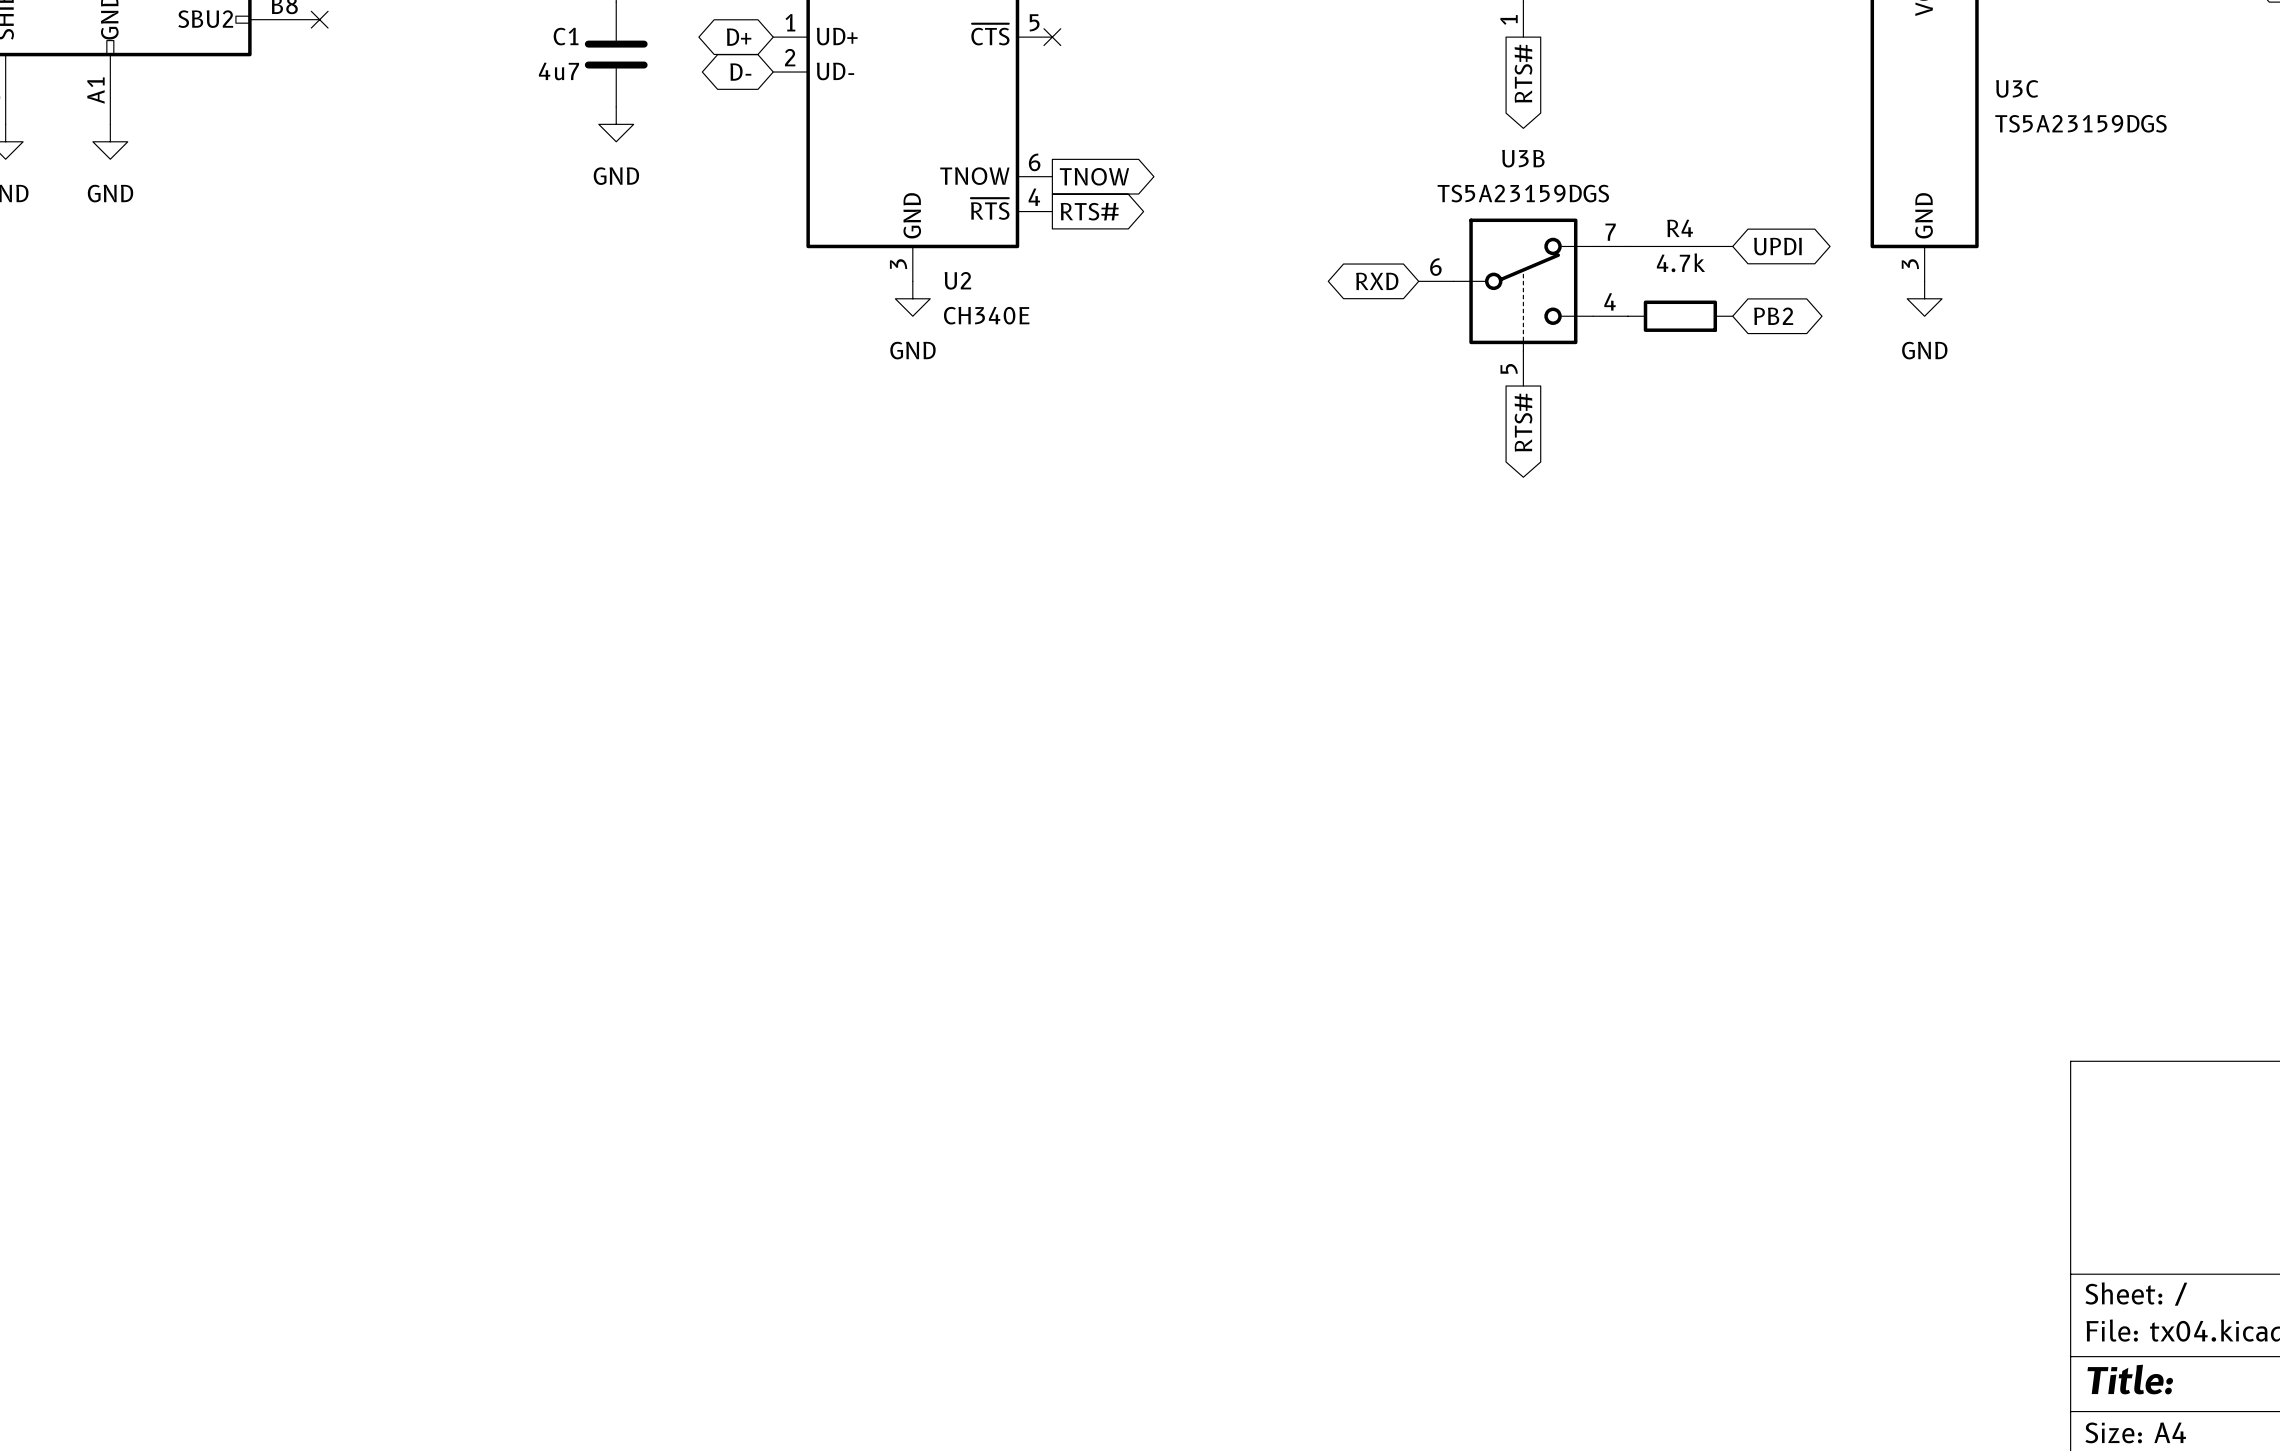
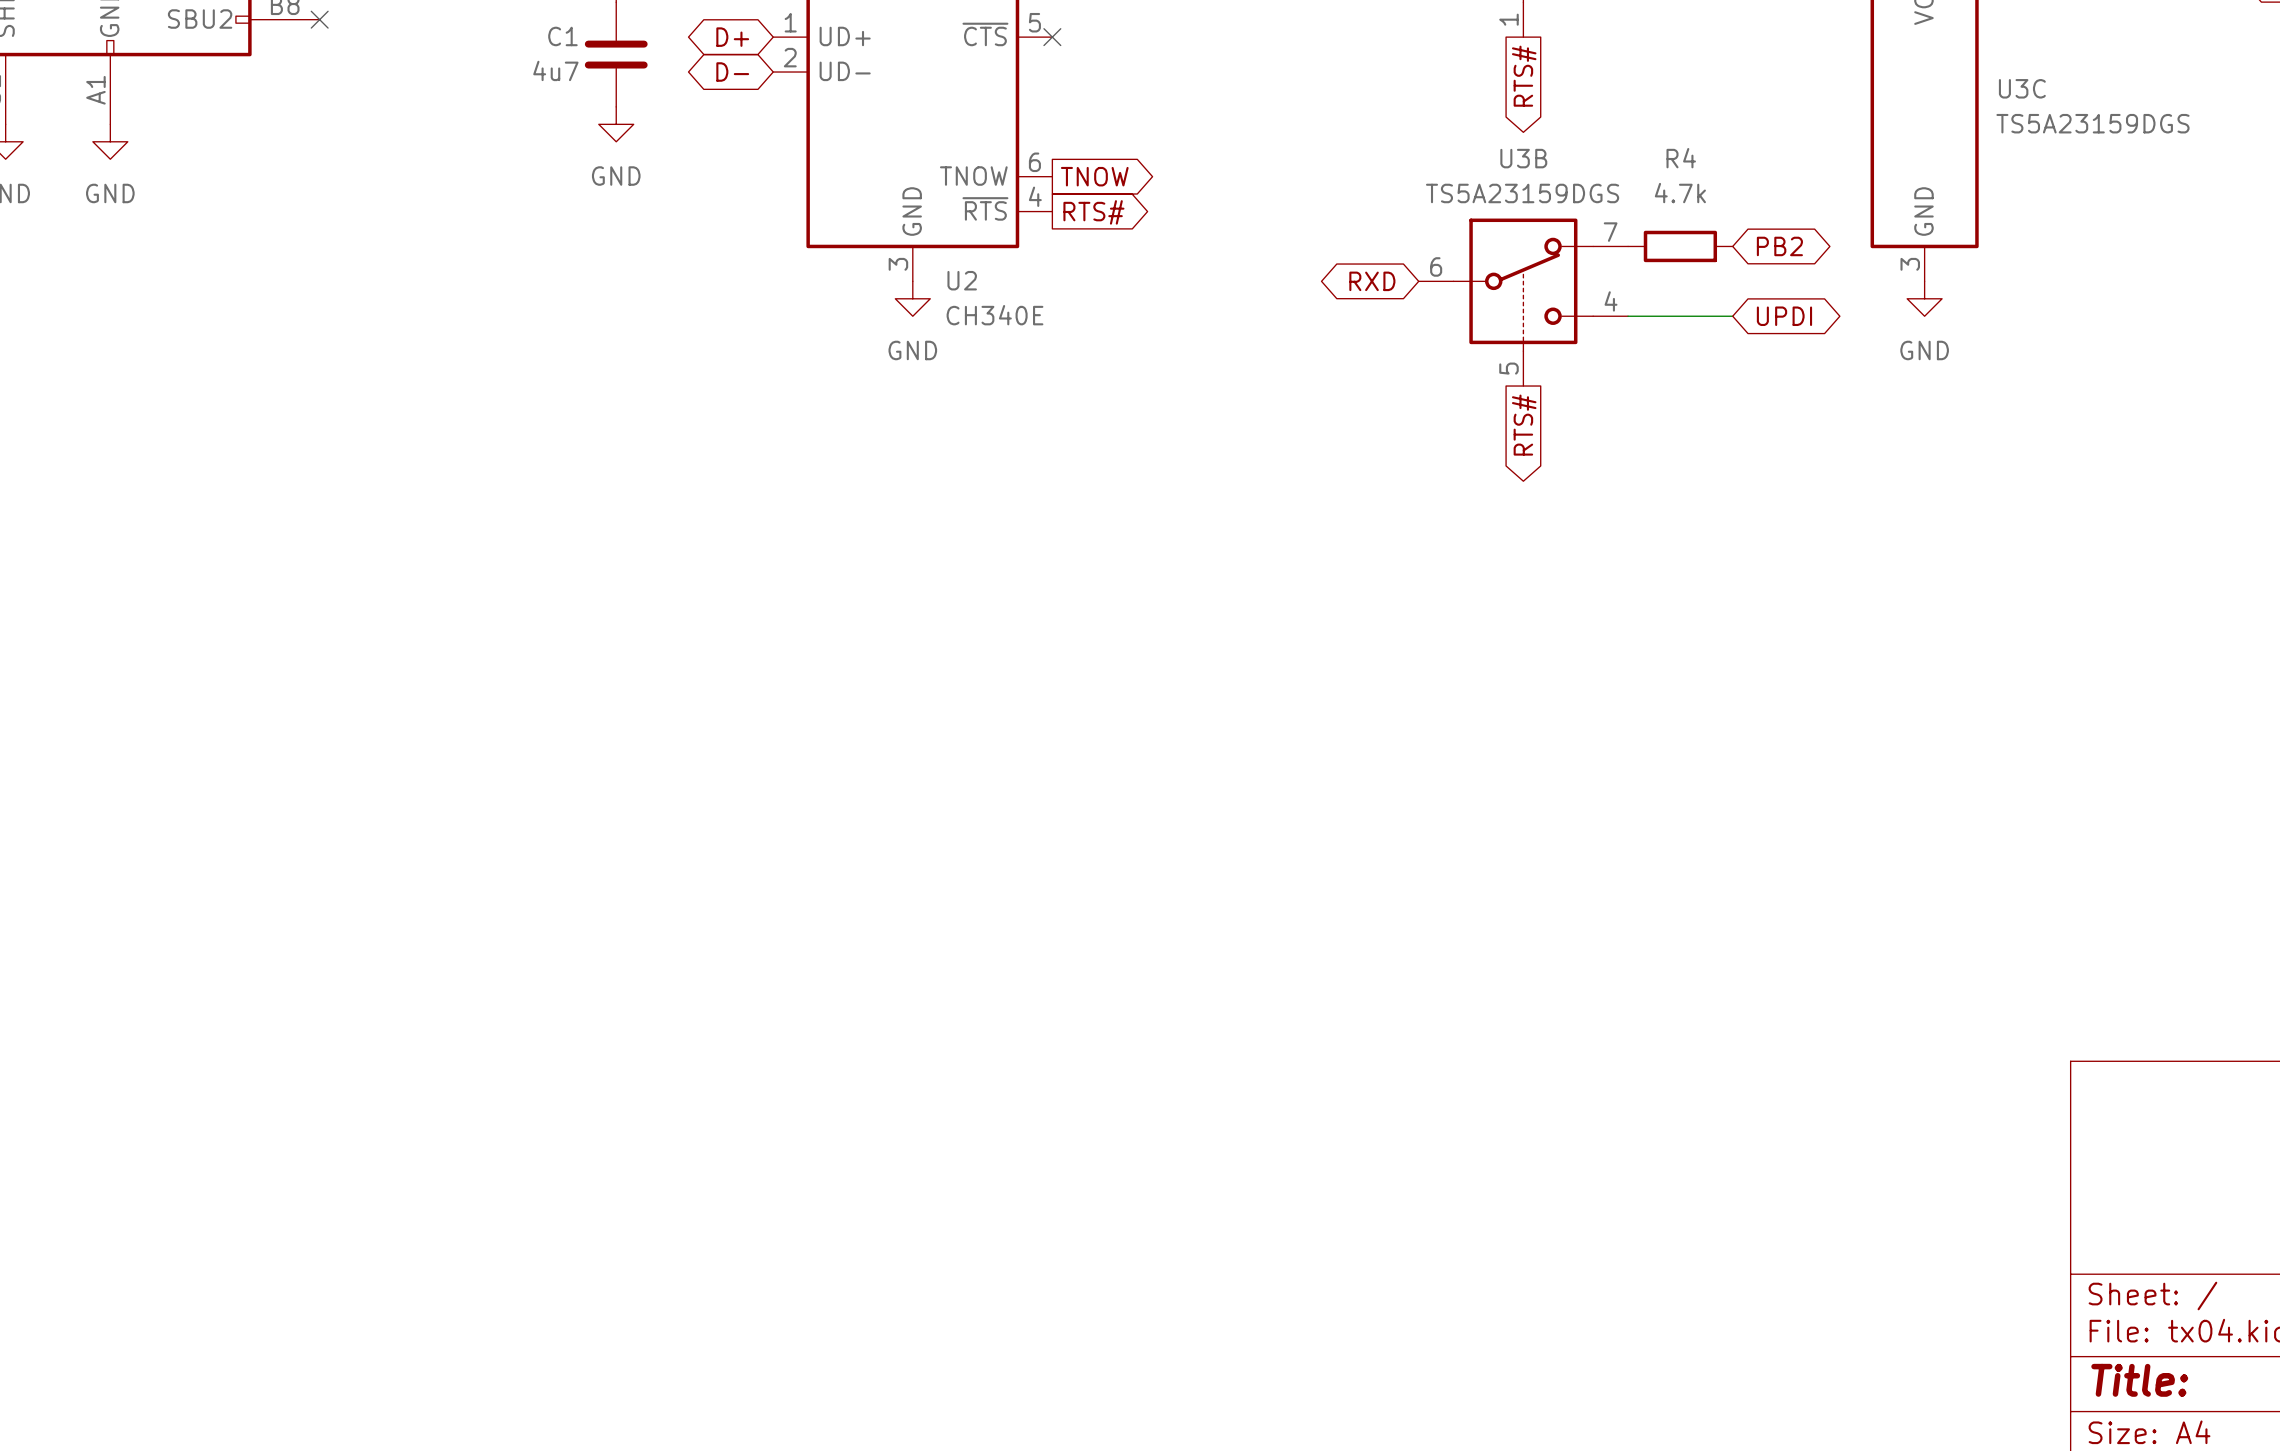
wire: (1628, 246) (1732, 246) -> (1628, 316) (1732, 316)
global label: UPDI (1777, 246) -> PB2 (1779, 246)
R4 position: (1680, 316) -> (1680, 246)
global label: PB2 (1773, 316) -> UPDI (1784, 316)

